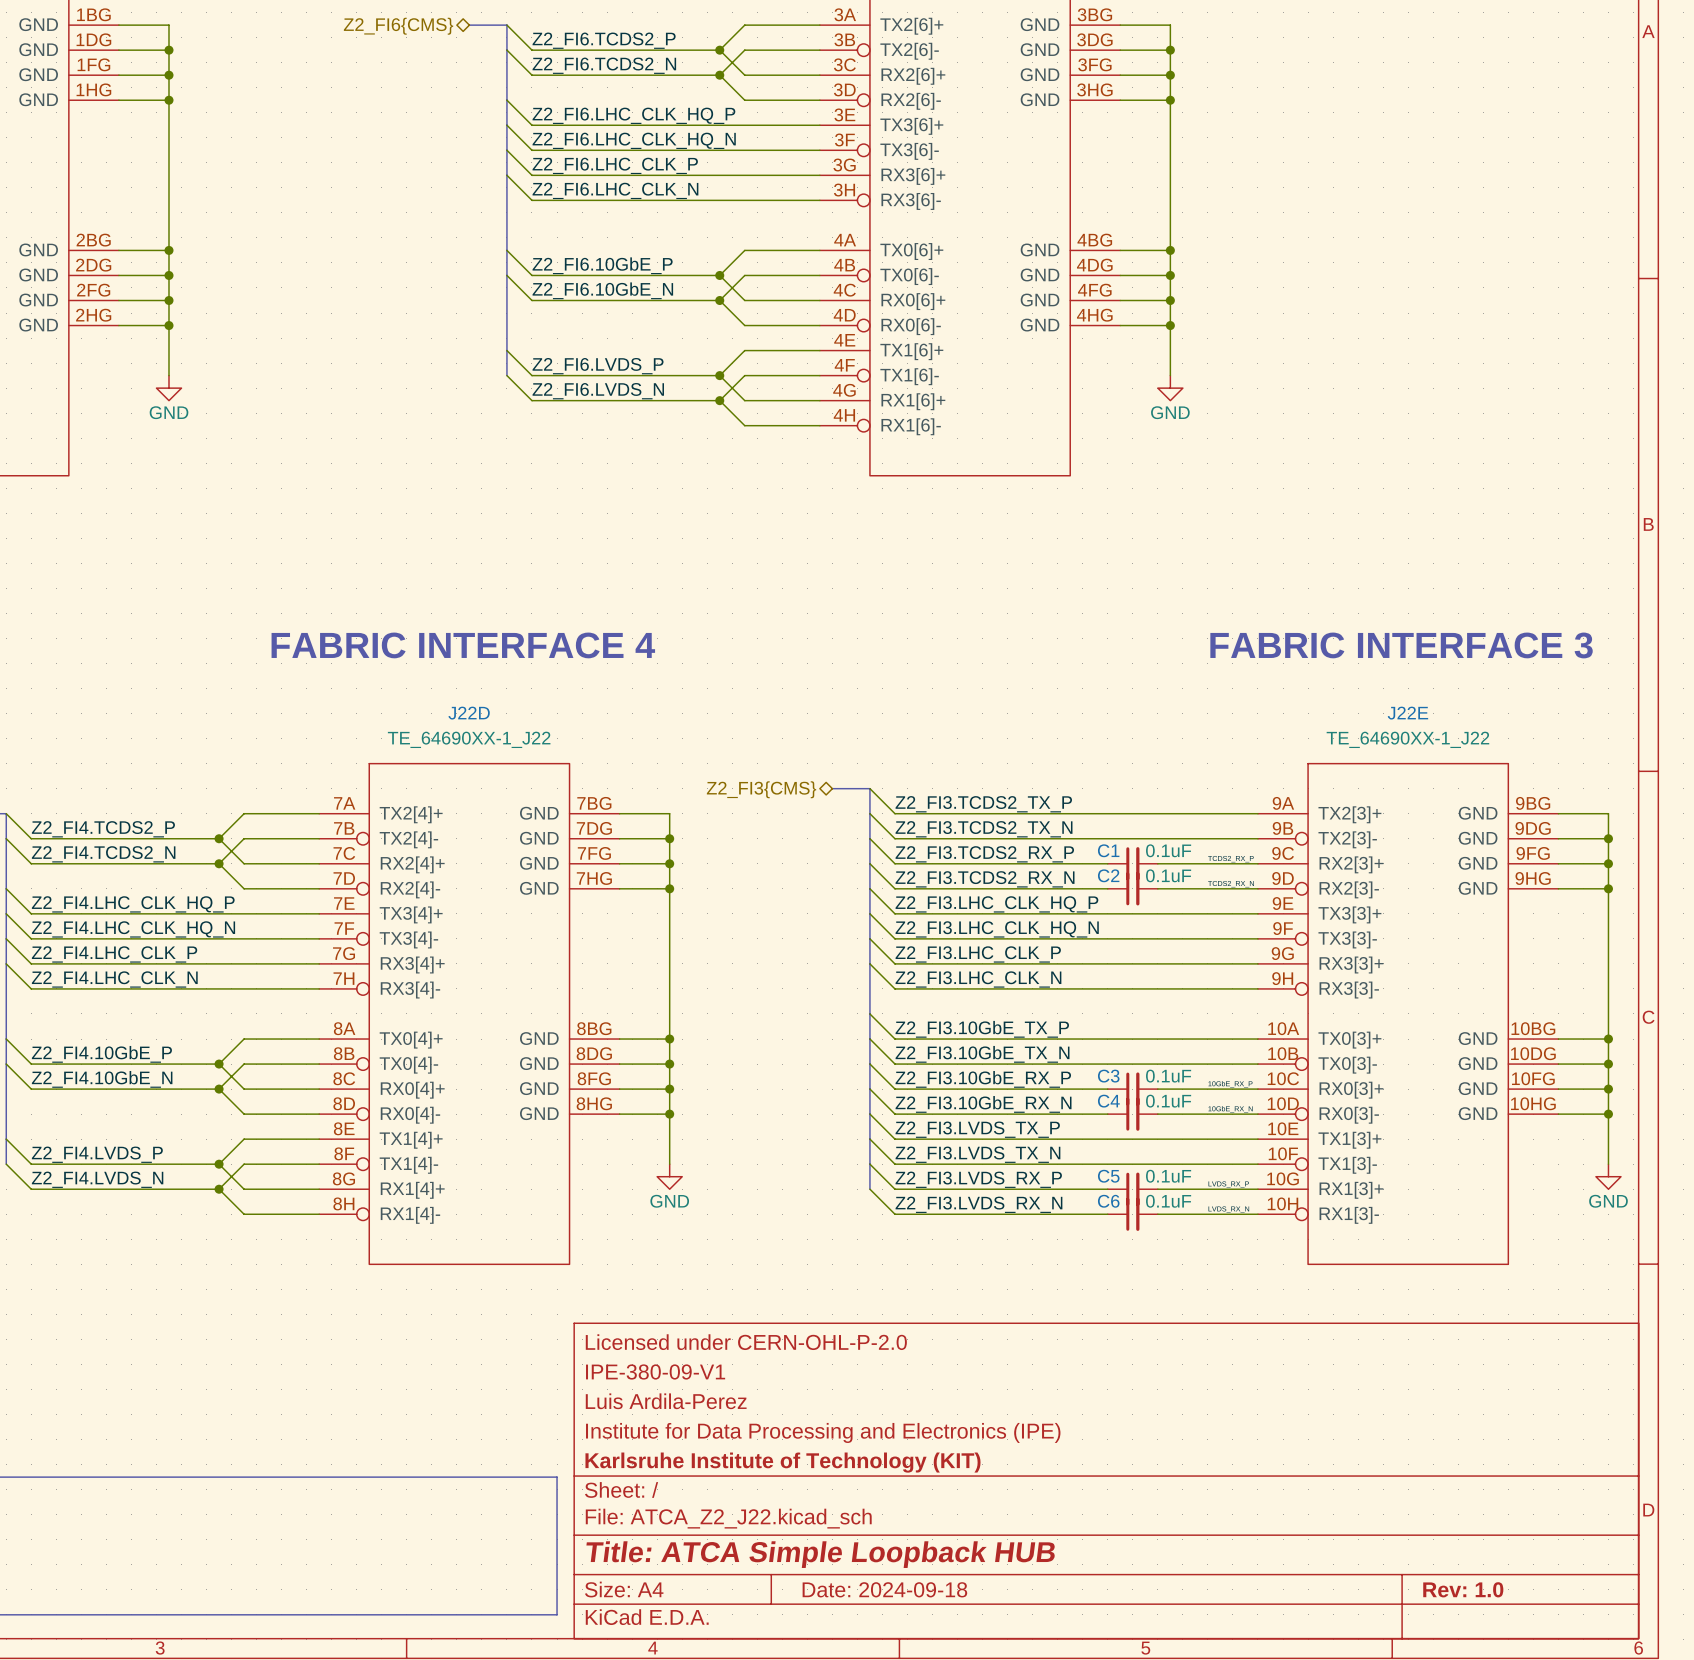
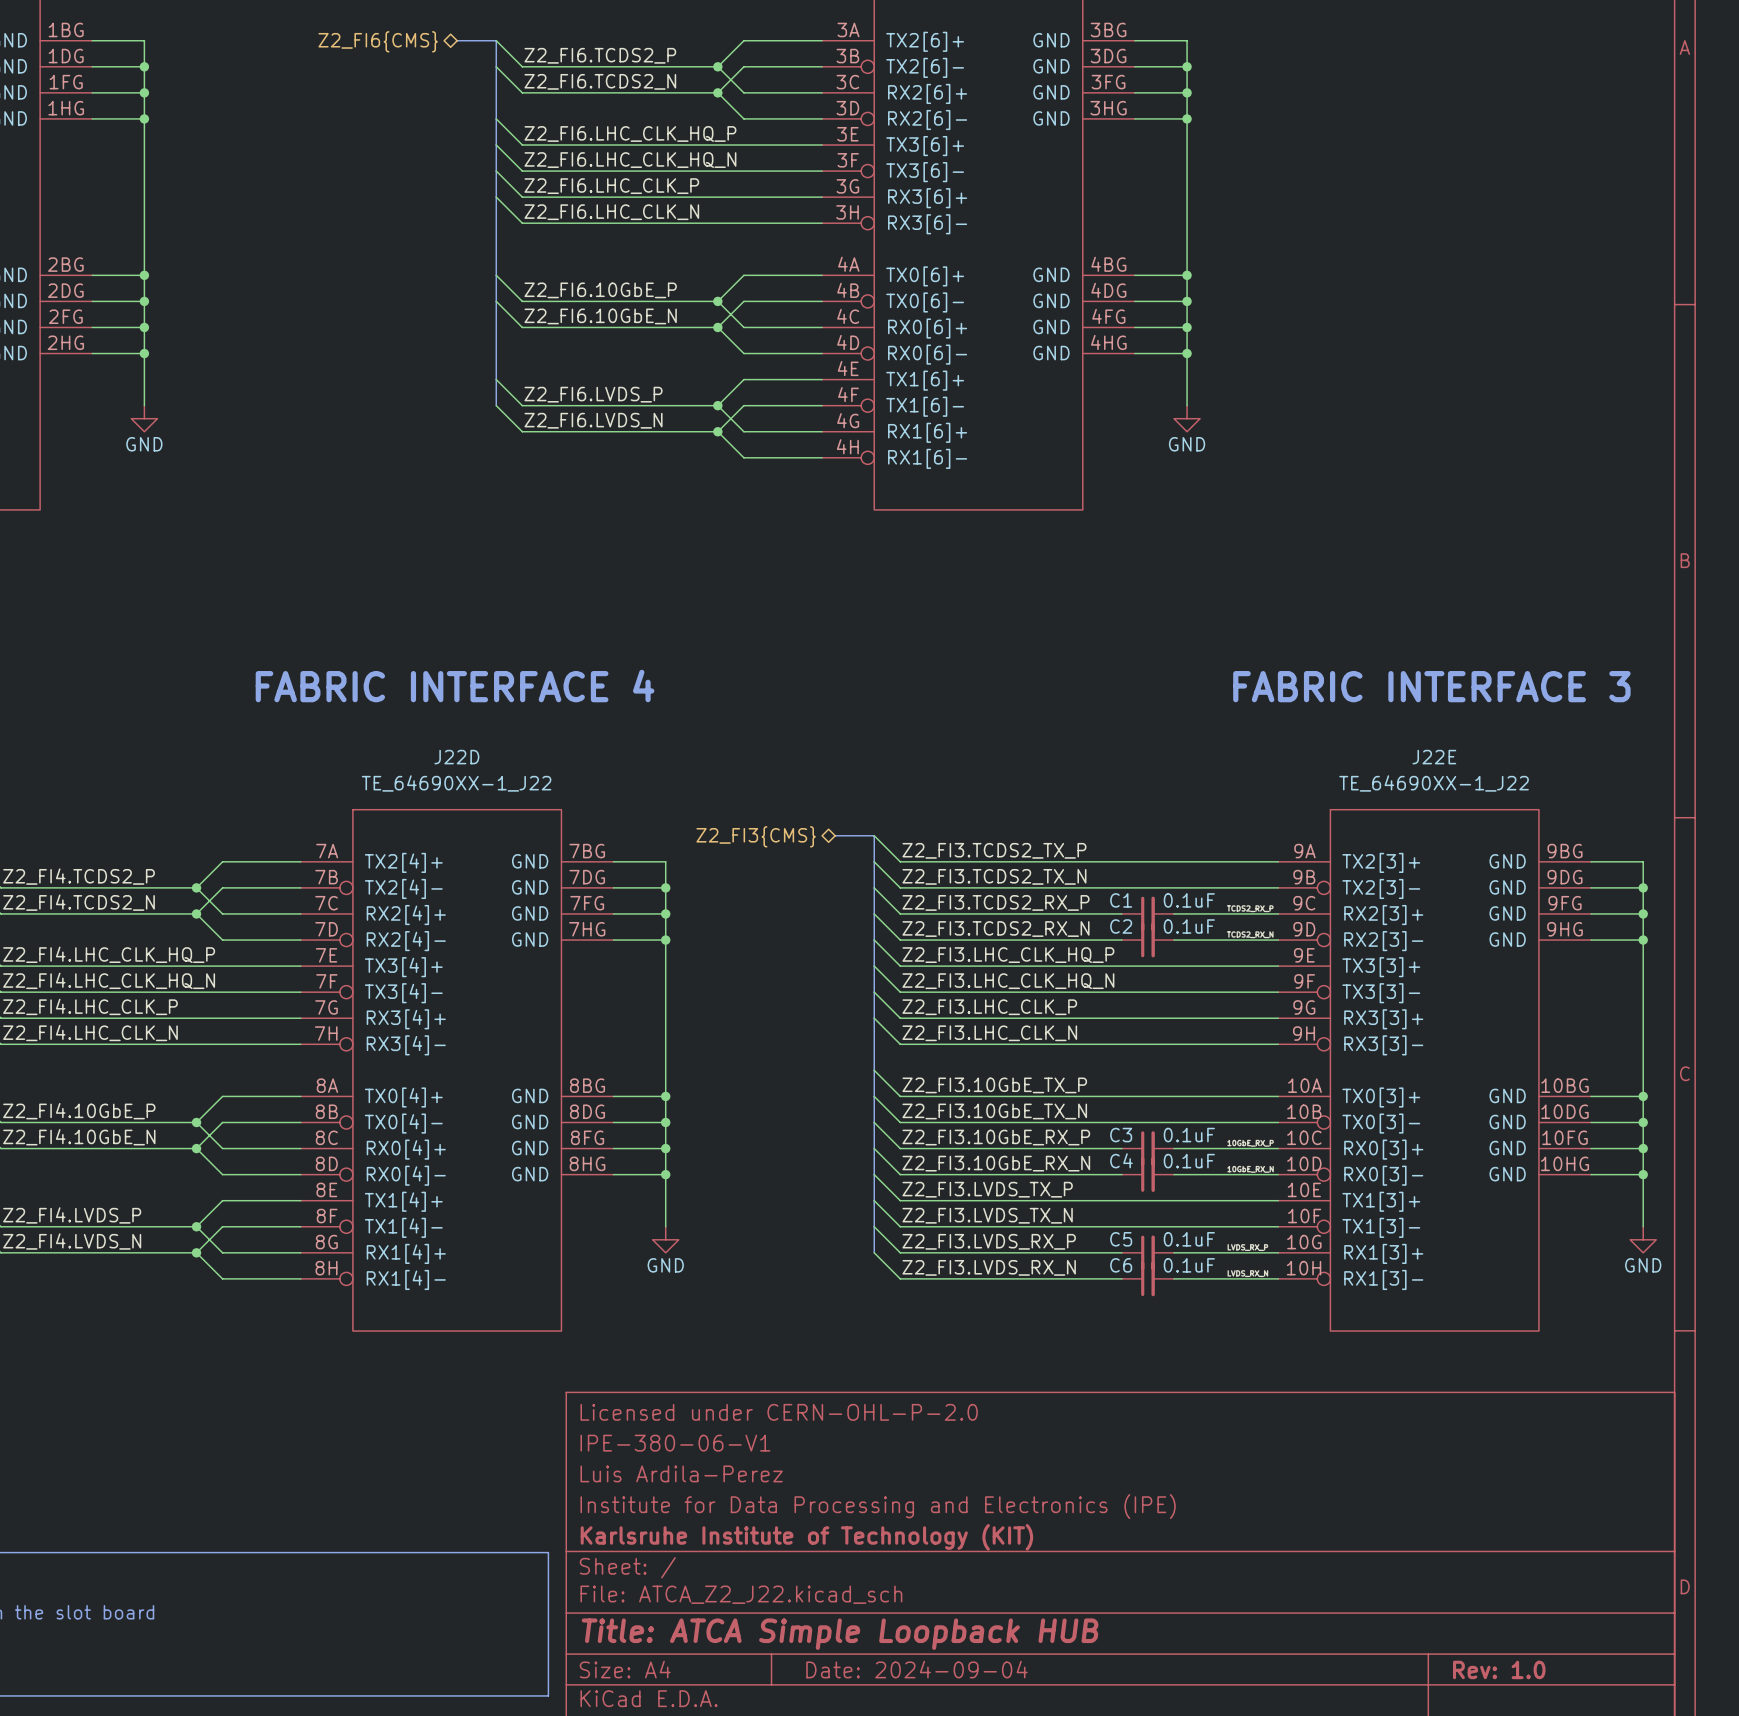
title block: IPE-380-09-V1 (655, 1371) -> IPE-380-06-V1 (675, 1443)
title block: Date: 2024-09-18 (884, 1589) -> Date: 2024-09-04 (916, 1669)

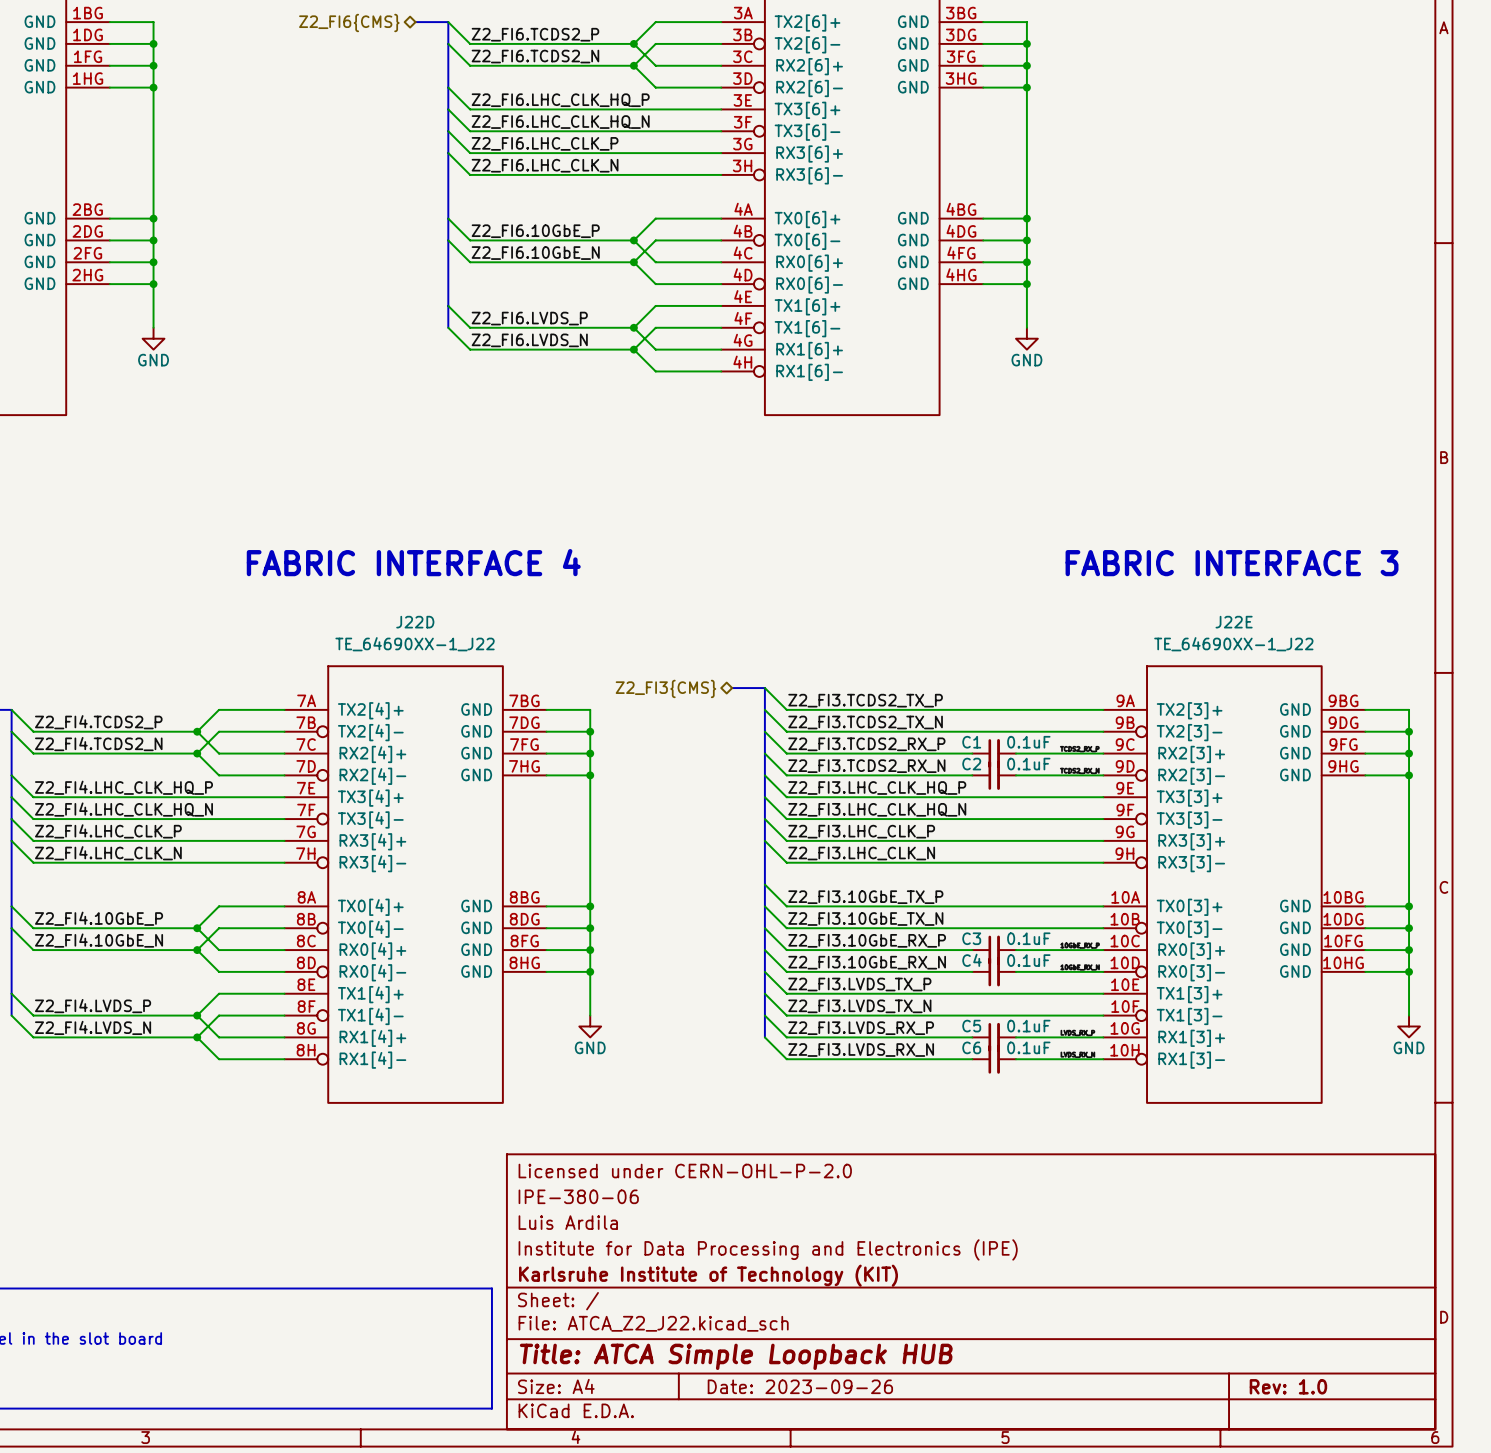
title block: IPE-380-06-V1 (675, 1443) -> IPE-380-06 (578, 1196)
title block: Luis Ardila-Perez (681, 1473) -> Luis Ardila (568, 1222)
title block: Date: 2024-09-04 (916, 1669) -> Date: 2023-09-26 (800, 1386)

